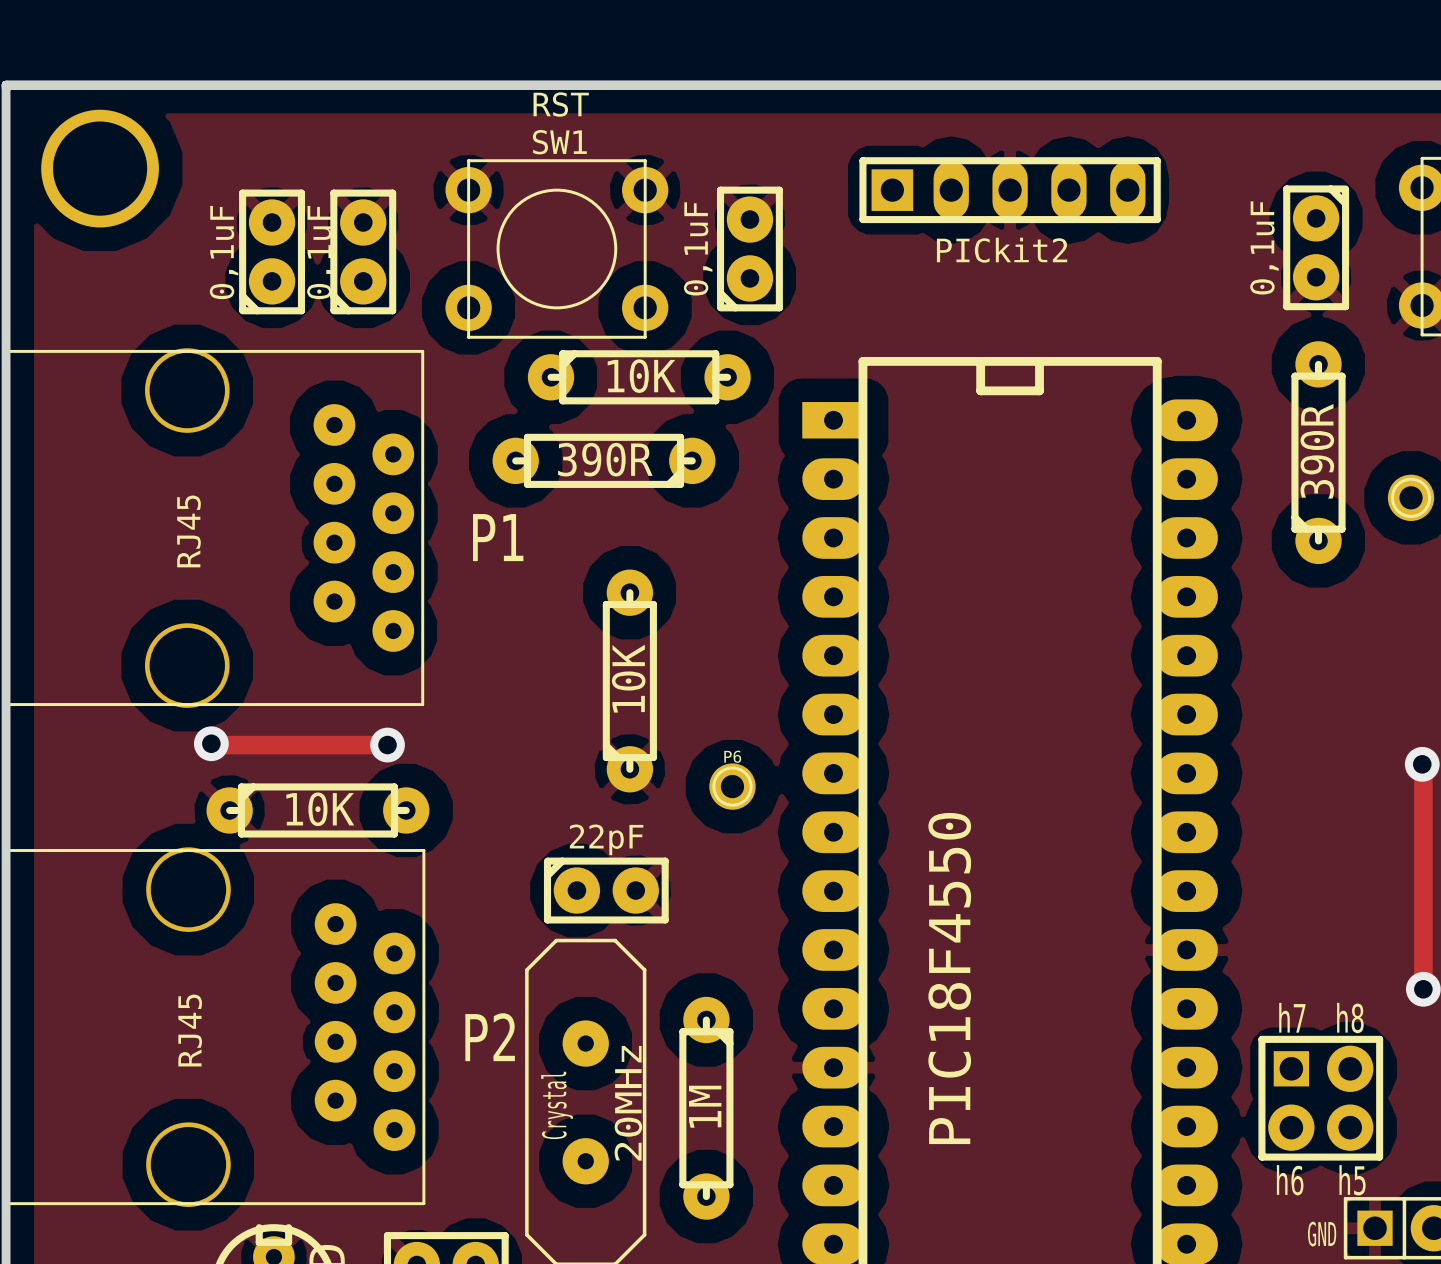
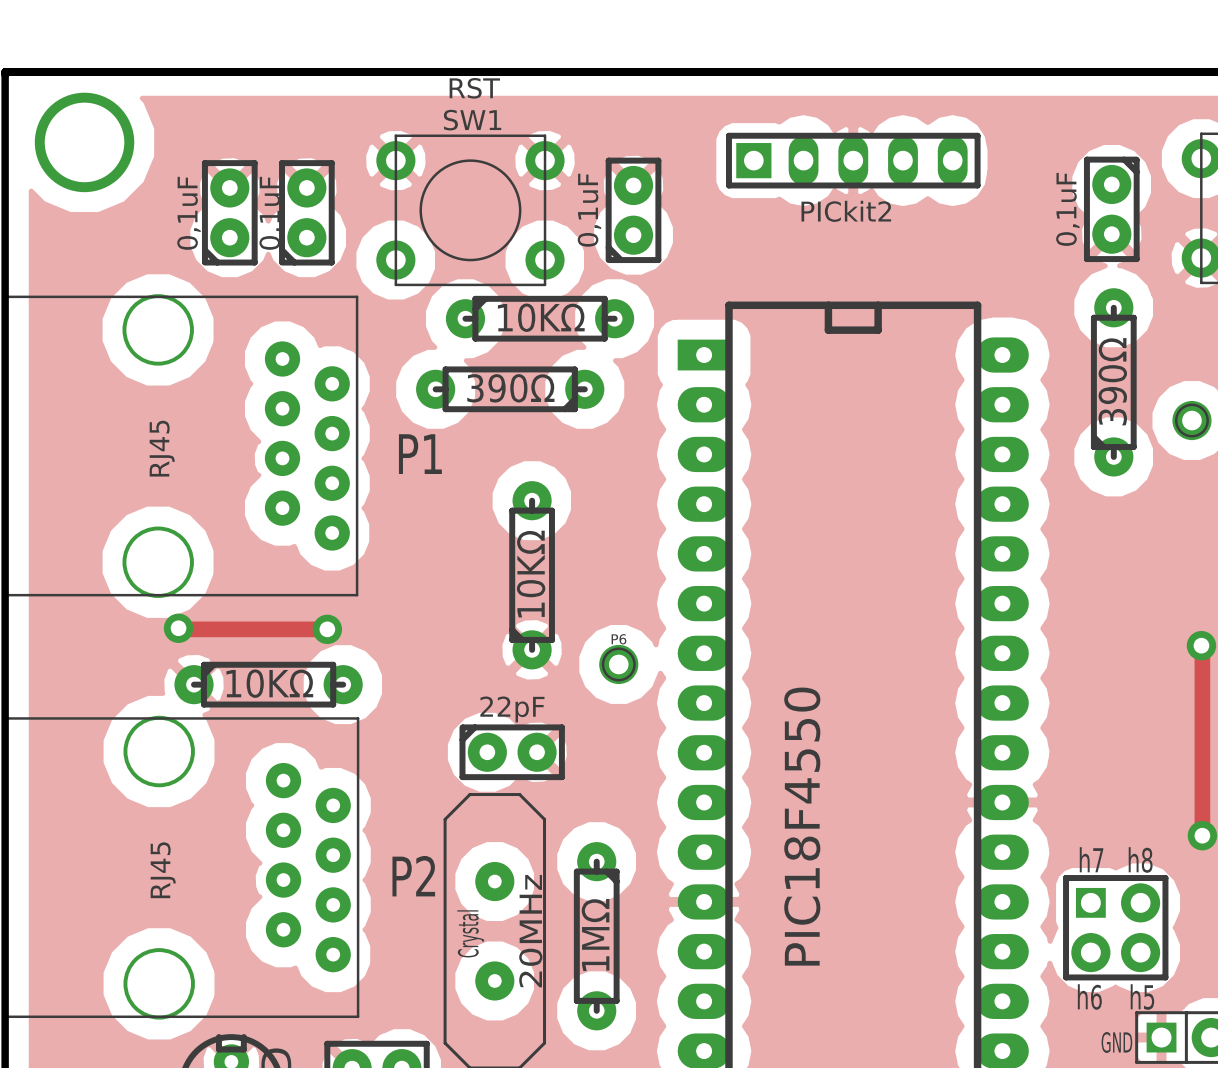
part value: 10K (641, 376) -> 10KΩ (541, 317)
part value: 390R (1317, 451) -> 390Ω (1112, 381)
part value: 390R (605, 459) -> 390Ω (510, 388)
part value: 10K (628, 678) -> 10KΩ (531, 574)
part value: 10K (320, 809) -> 10KΩ (269, 683)
part value: 1M (705, 1106) -> 1MΩ (595, 935)

